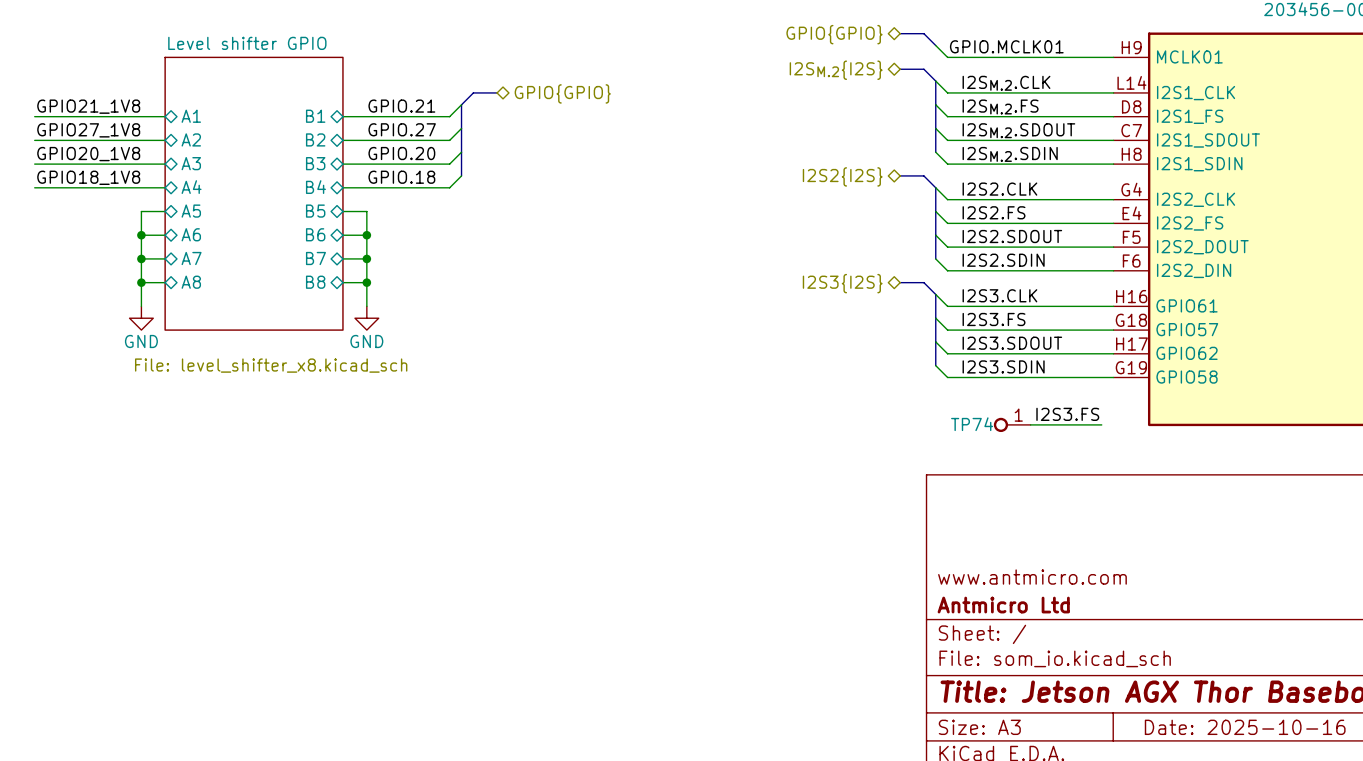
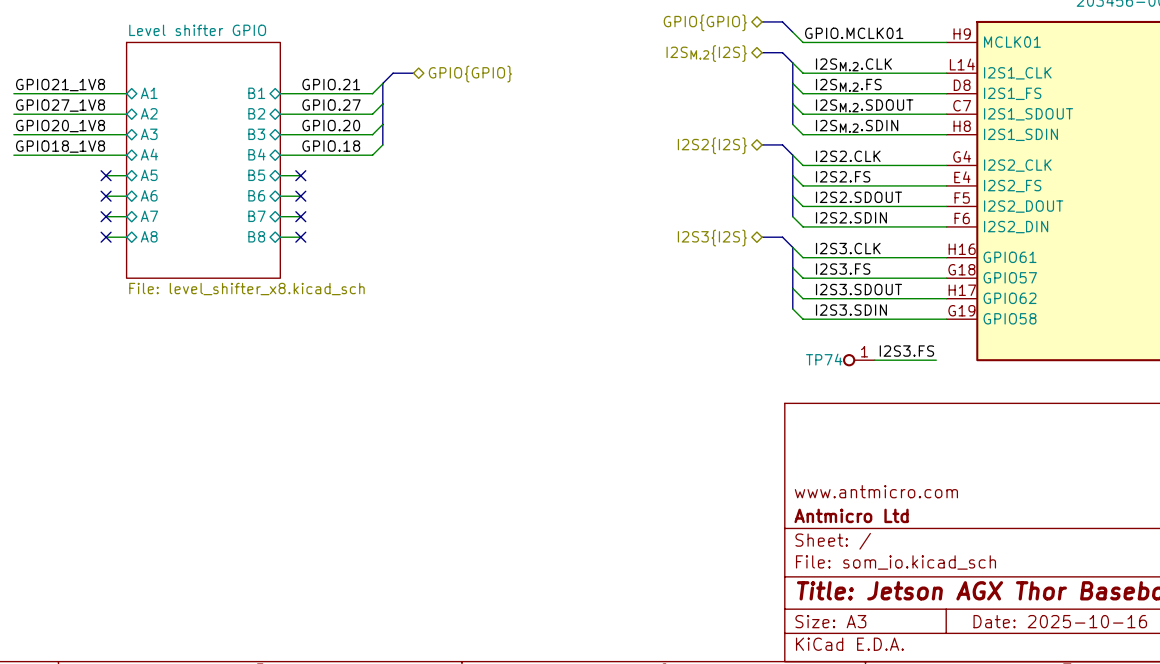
wire: (141, 211) (141, 306) -> none
no-connect mark: none -> (106, 175)
wire: (366, 211) (366, 306) -> none
no-connect mark: none -> (300, 175)
junction: (141, 235) -> none
no-connect mark: none -> (106, 196)
junction: (366, 235) -> none
no-connect mark: none -> (300, 196)
junction: (141, 258) -> none
no-connect mark: none -> (106, 216)
junction: (366, 258) -> none
no-connect mark: none -> (300, 216)
junction: (141, 282) -> none
no-connect mark: none -> (106, 237)
junction: (366, 282) -> none
no-connect mark: none -> (300, 237)
power symbol: GND (141, 318) -> none
power symbol: GND (366, 318) -> none
sheet Level shifter GPIO value position: File: level_shifter_x8.kicad_sch (271, 365) -> File: level_shifter_x8.kicad_sch (246, 289)

